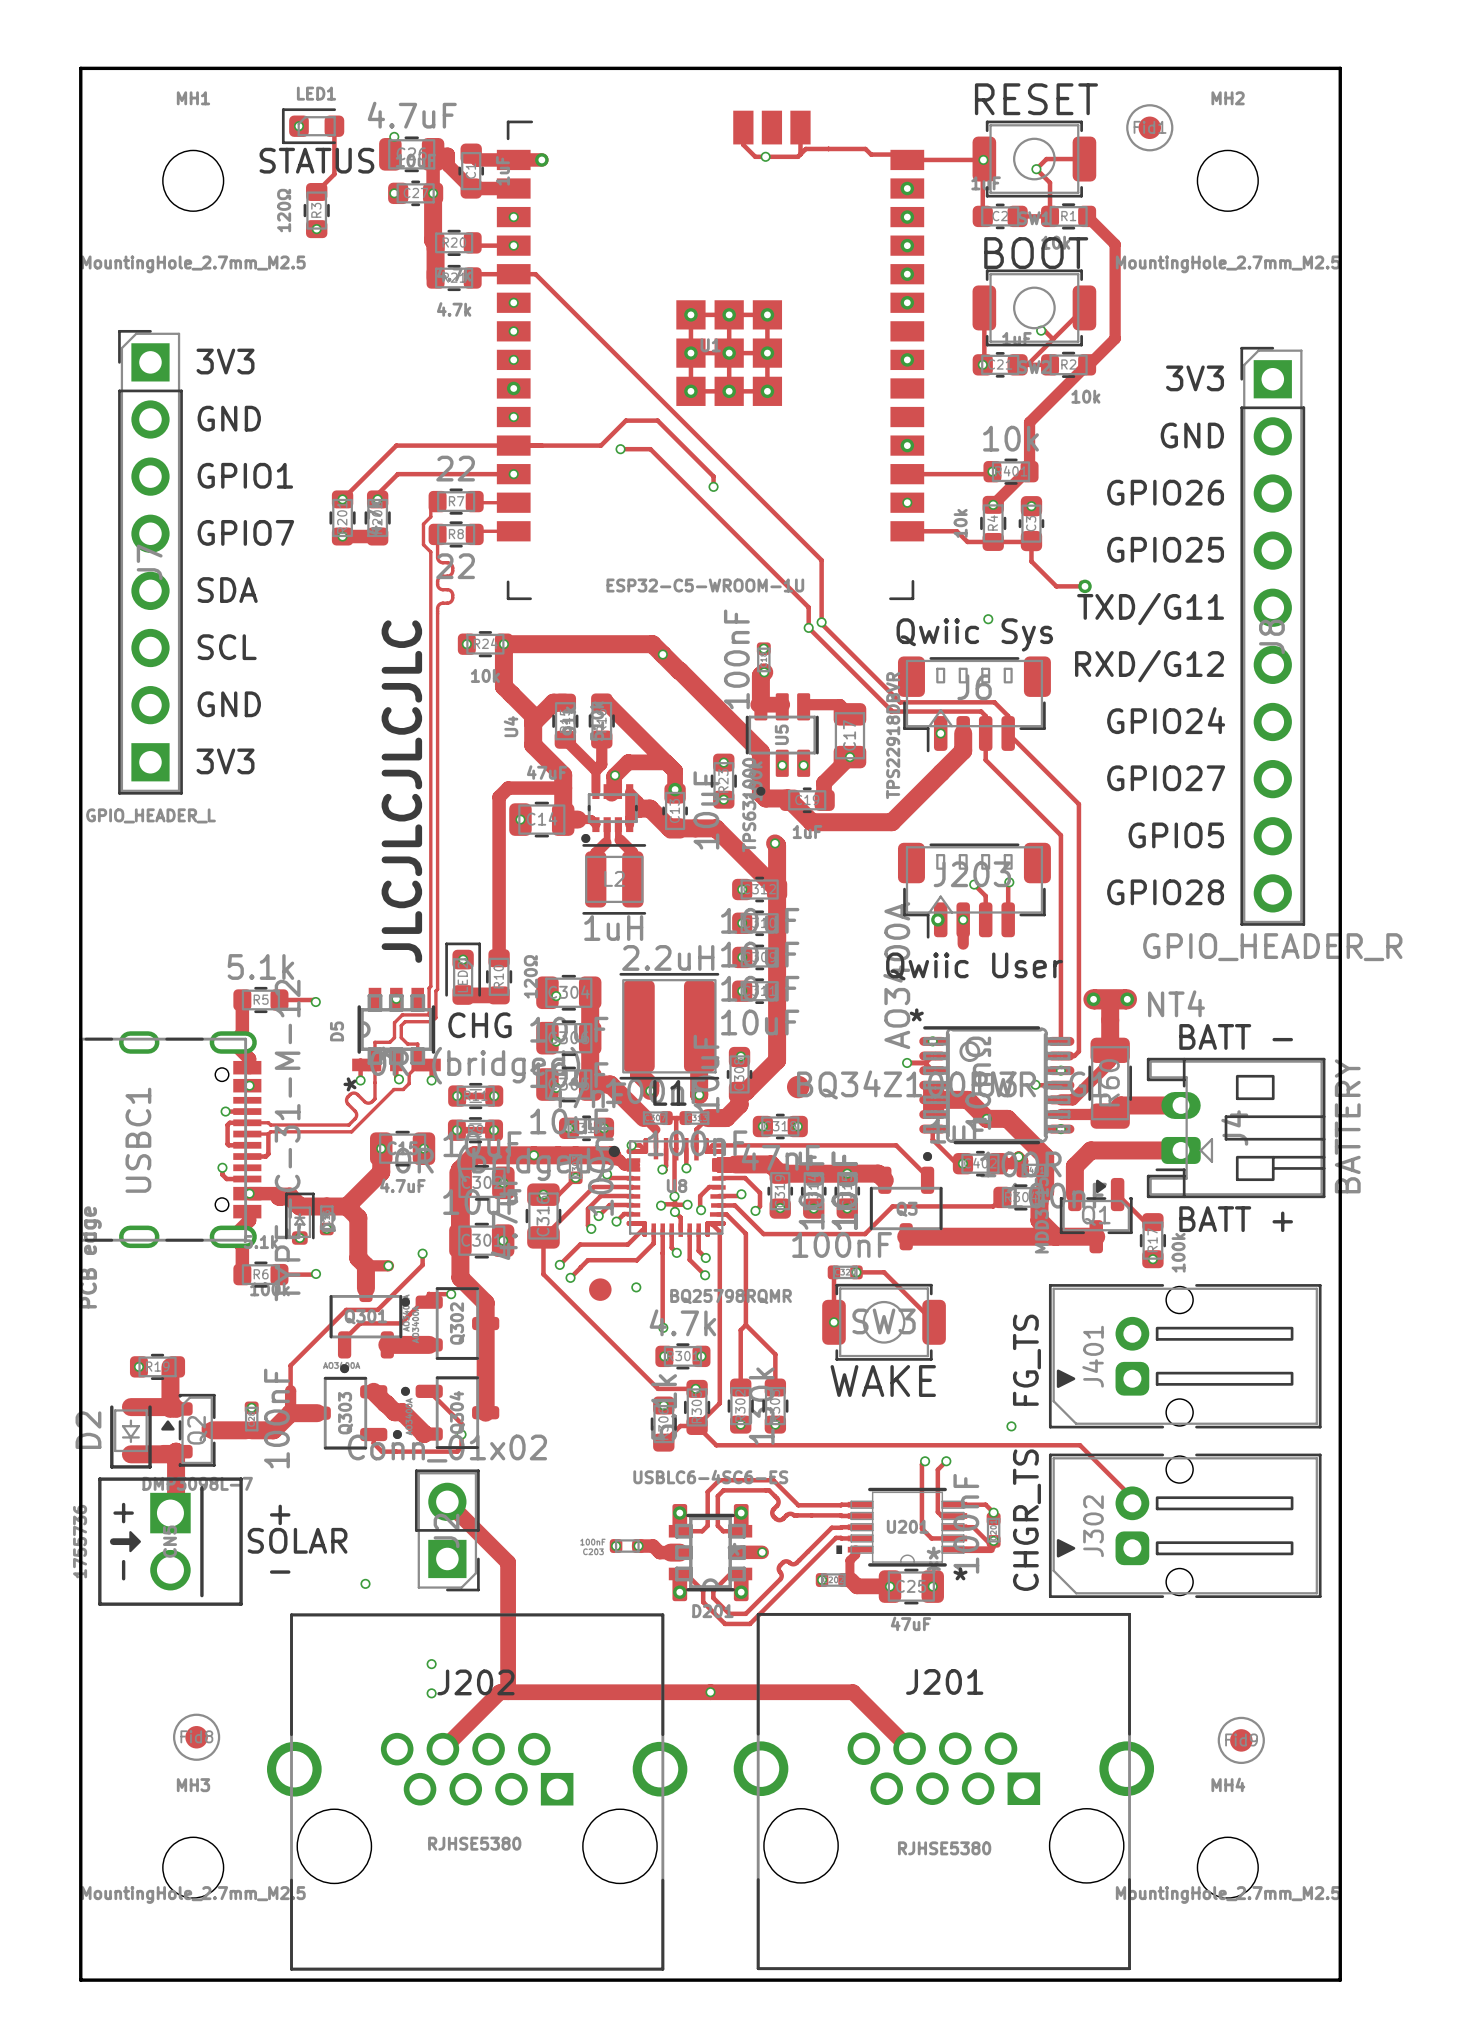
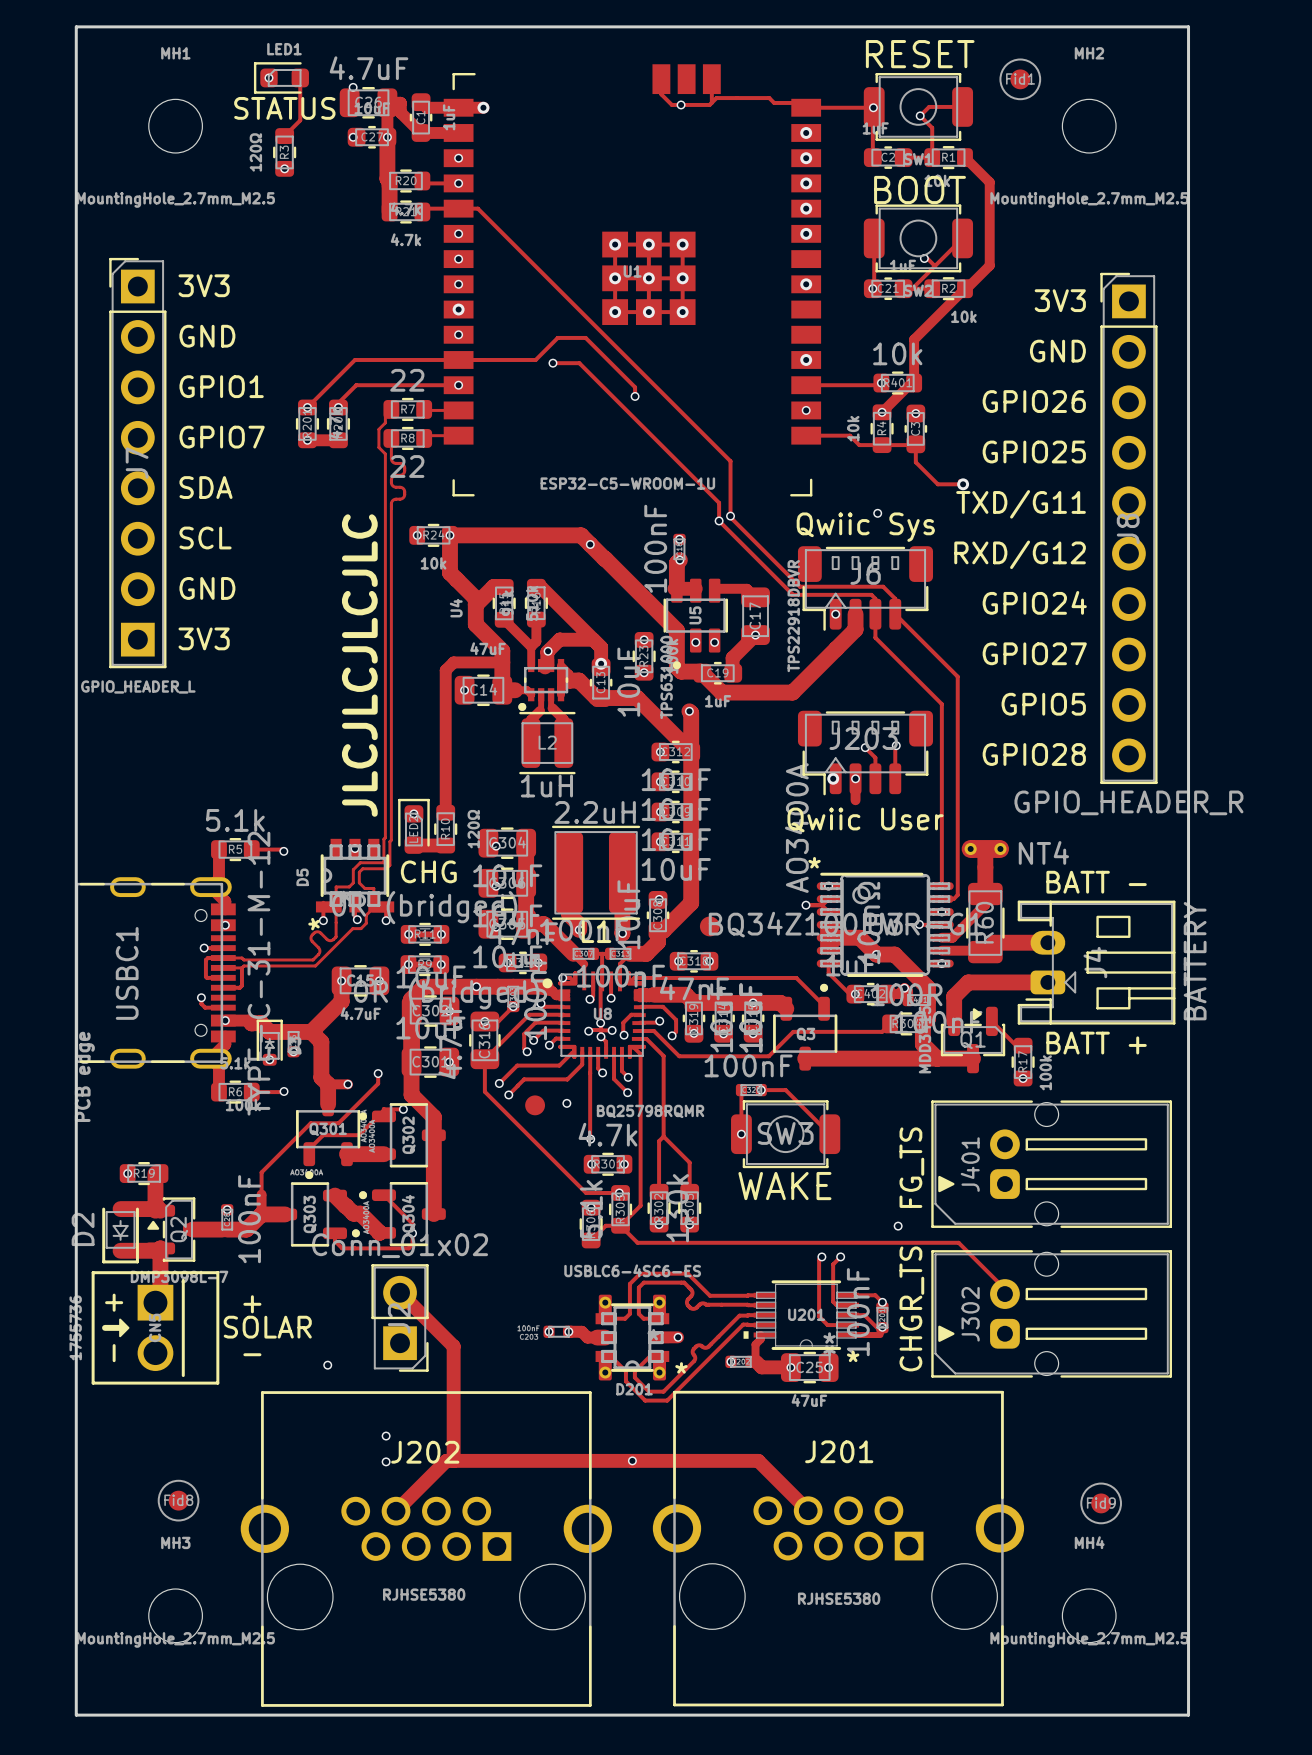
D201 text: none -> * (681, 1367)

